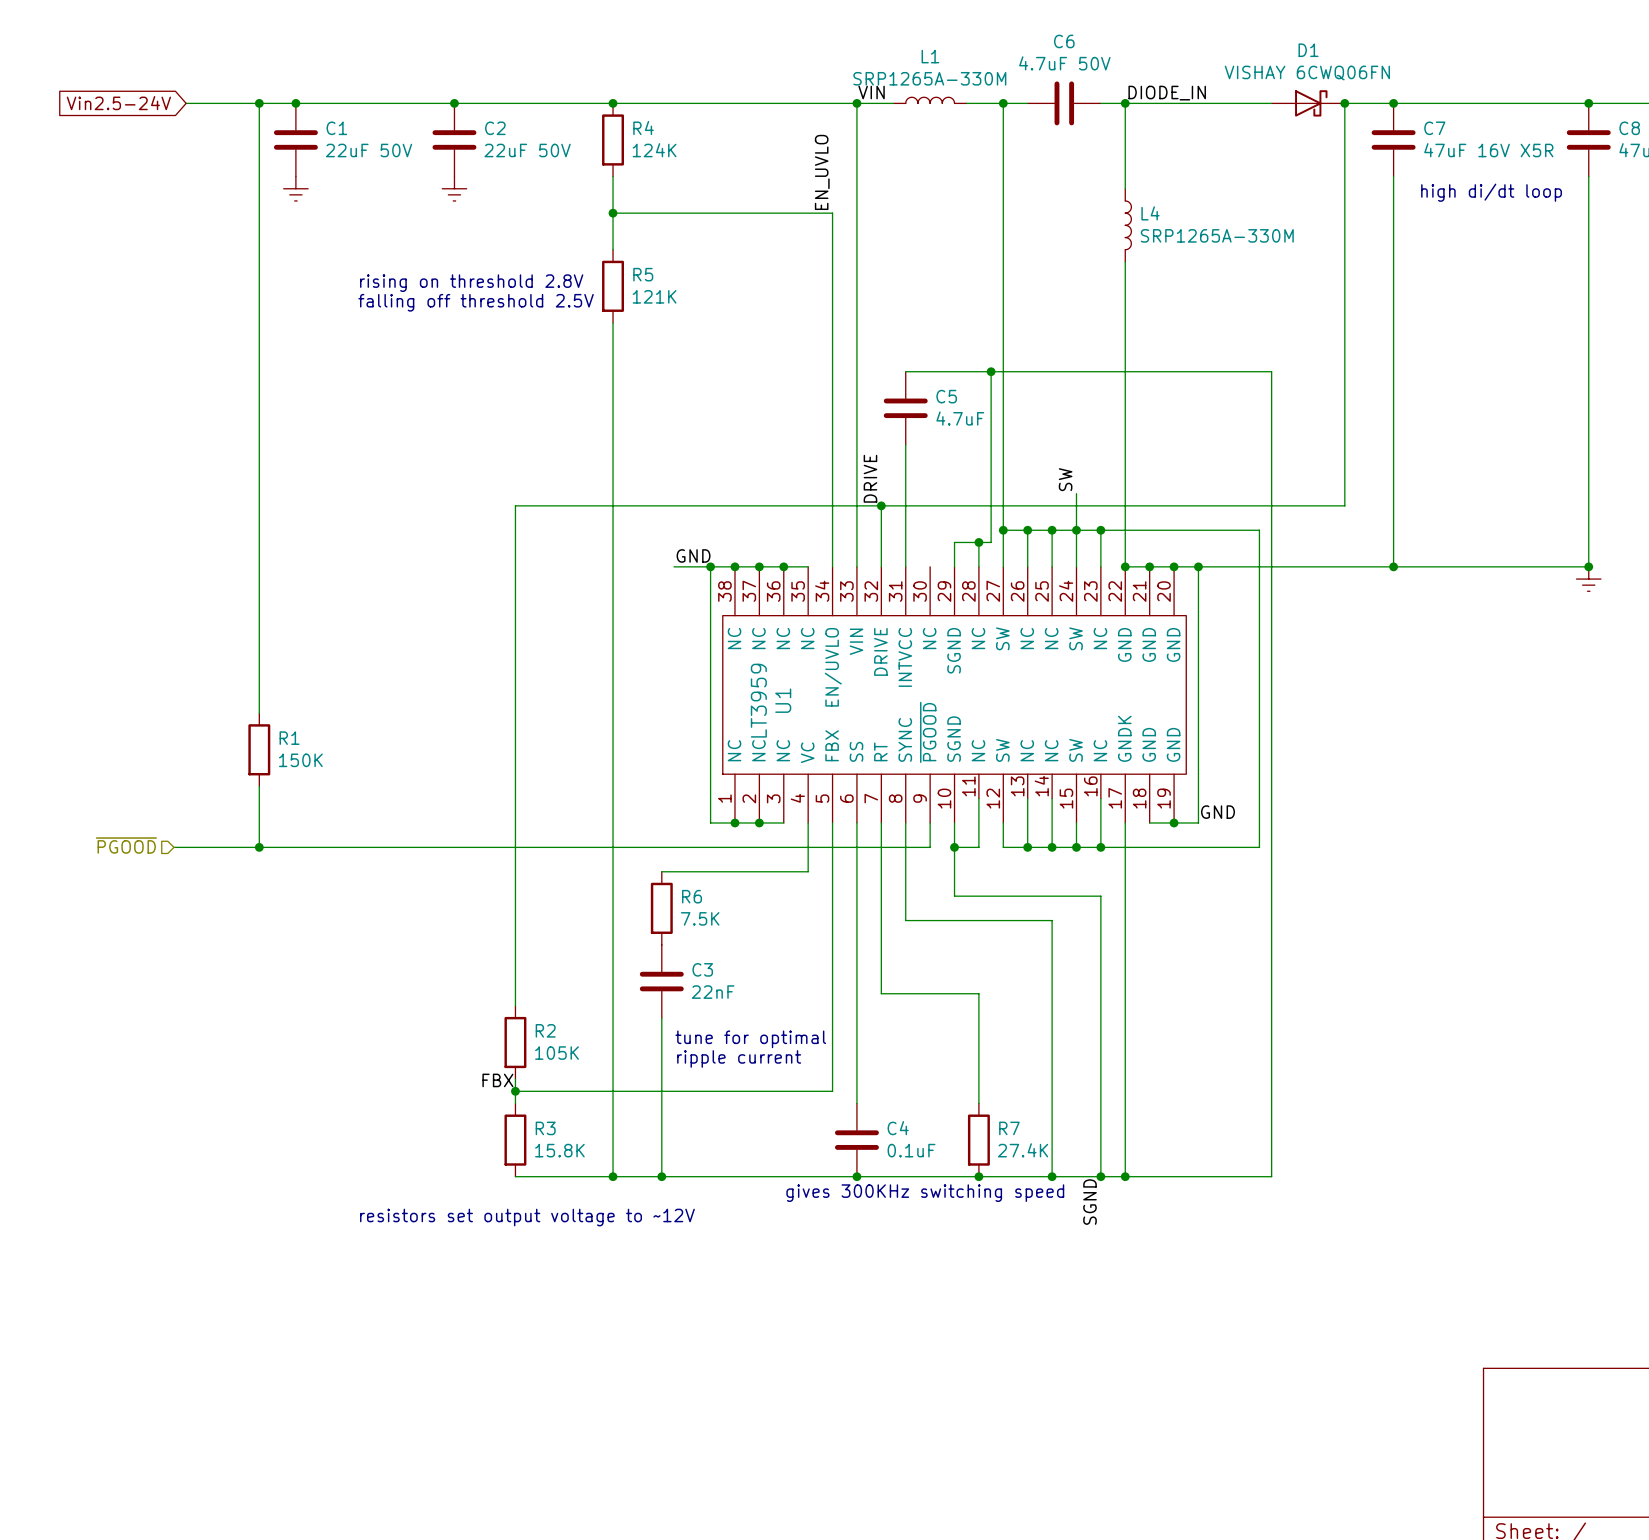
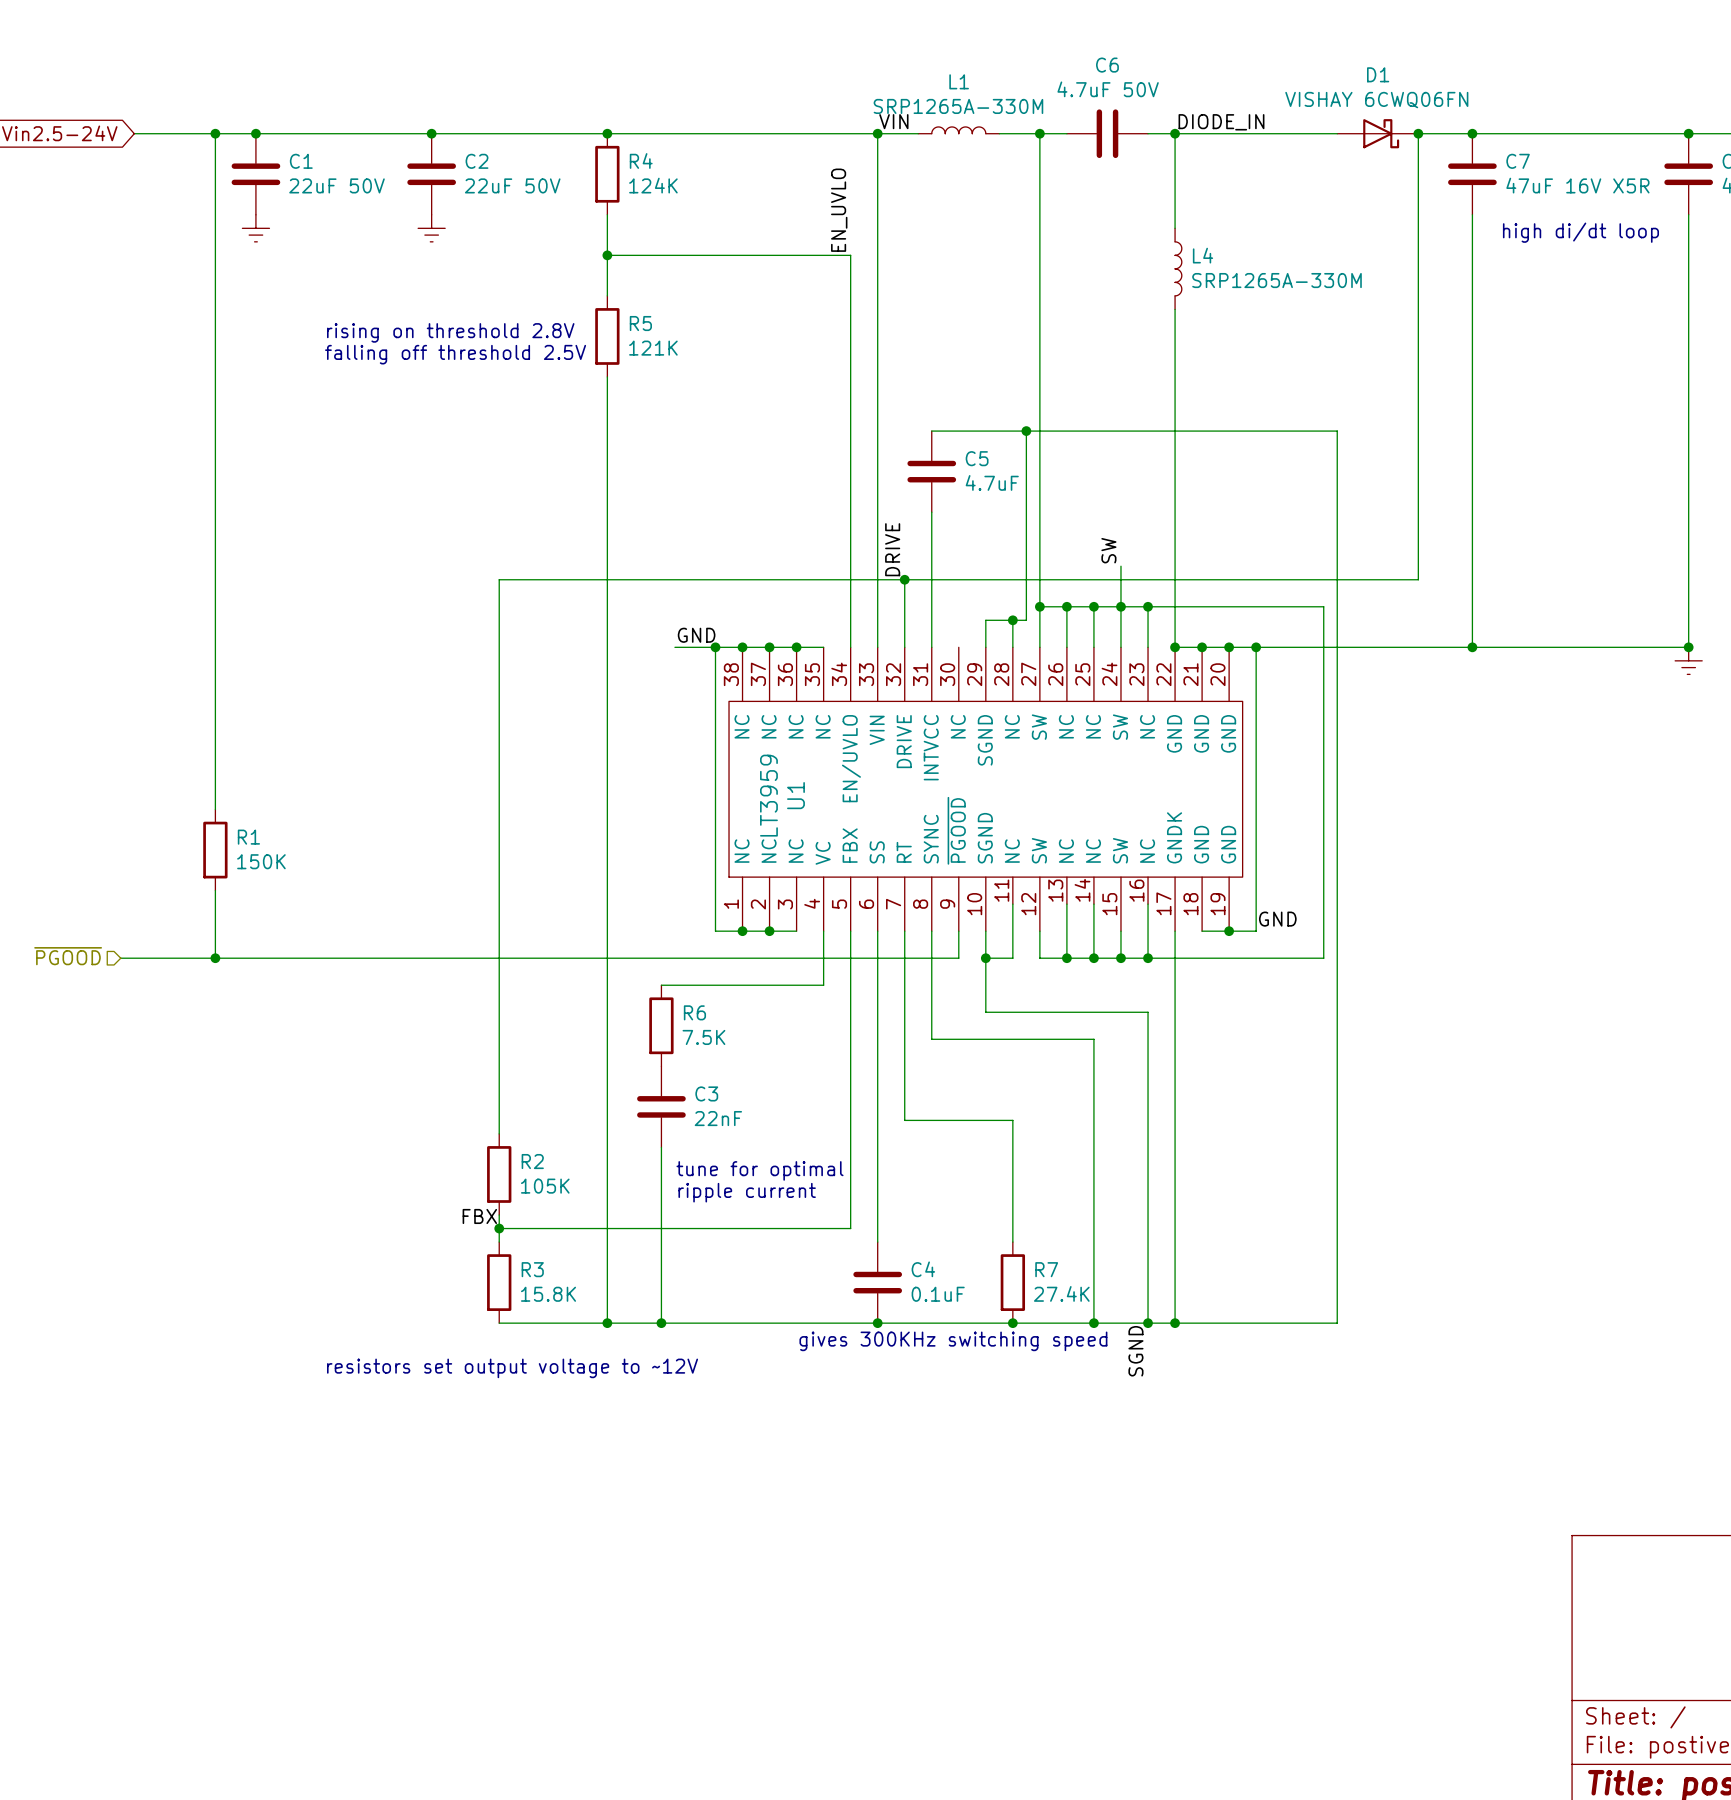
D1 flip: as is (1311, 103) -> up-down (1381, 133)

